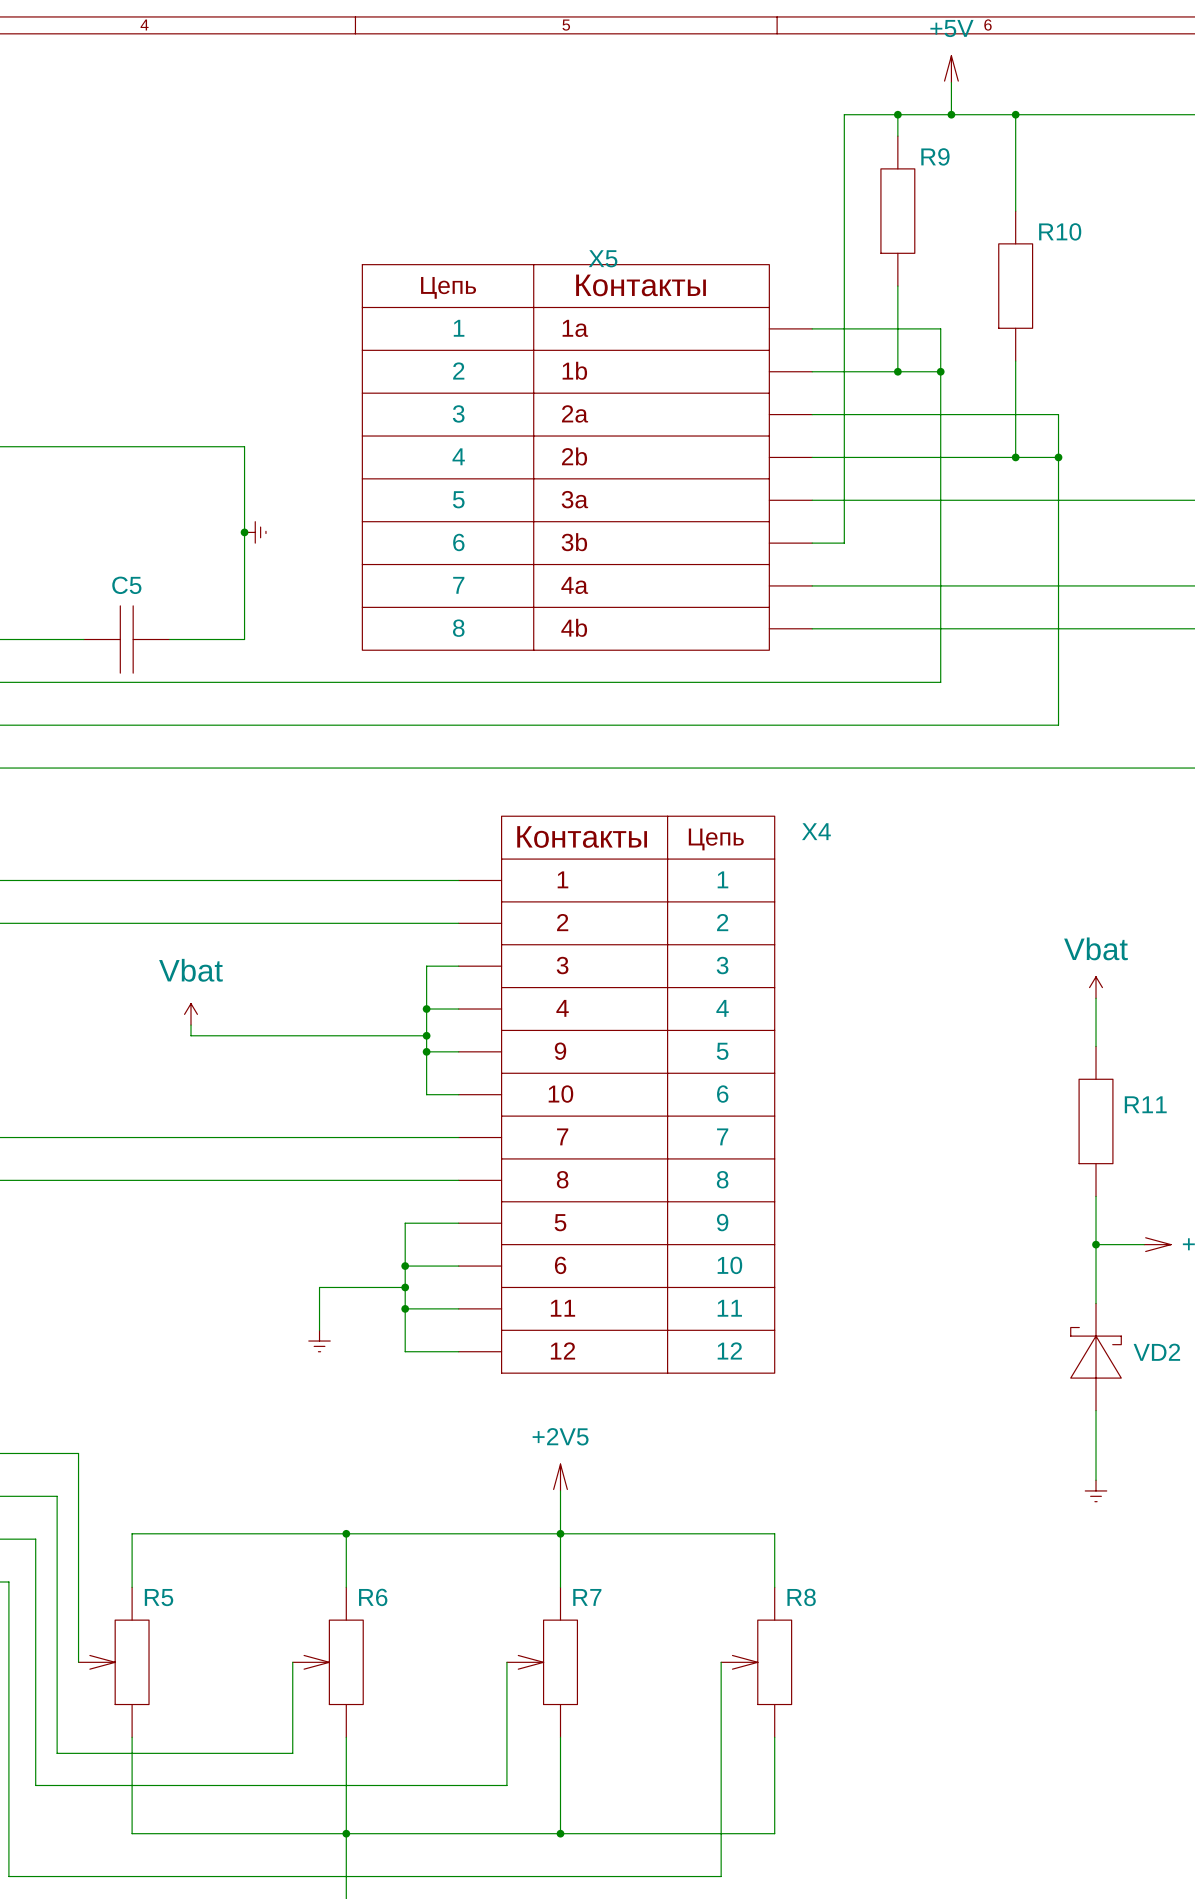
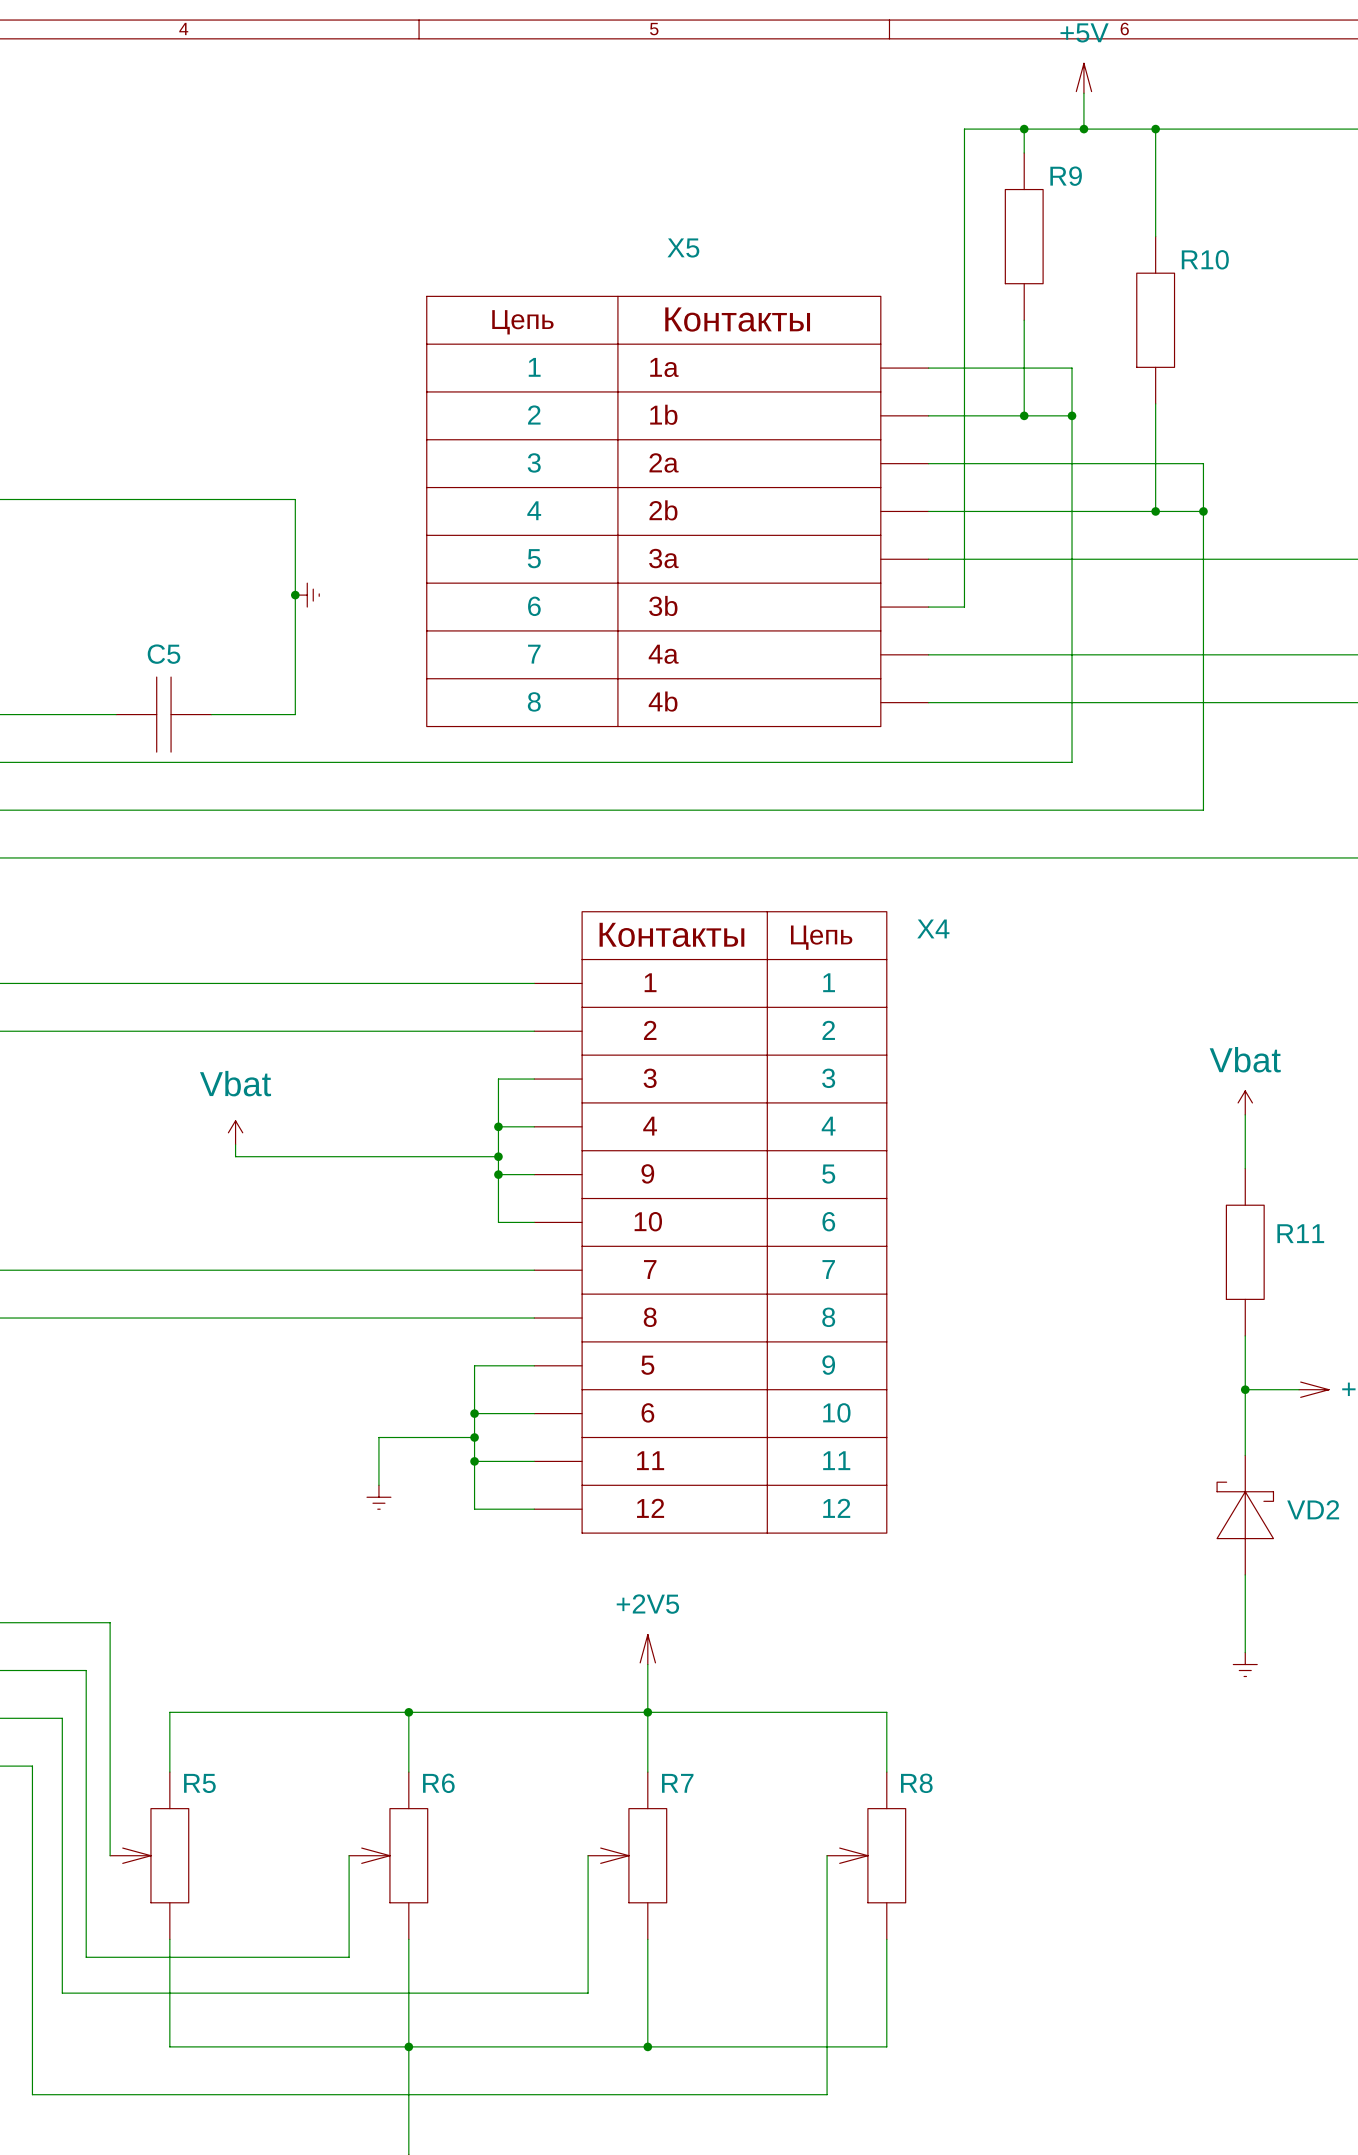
X5 name position: X5 (603, 258) -> X5 (683, 248)

